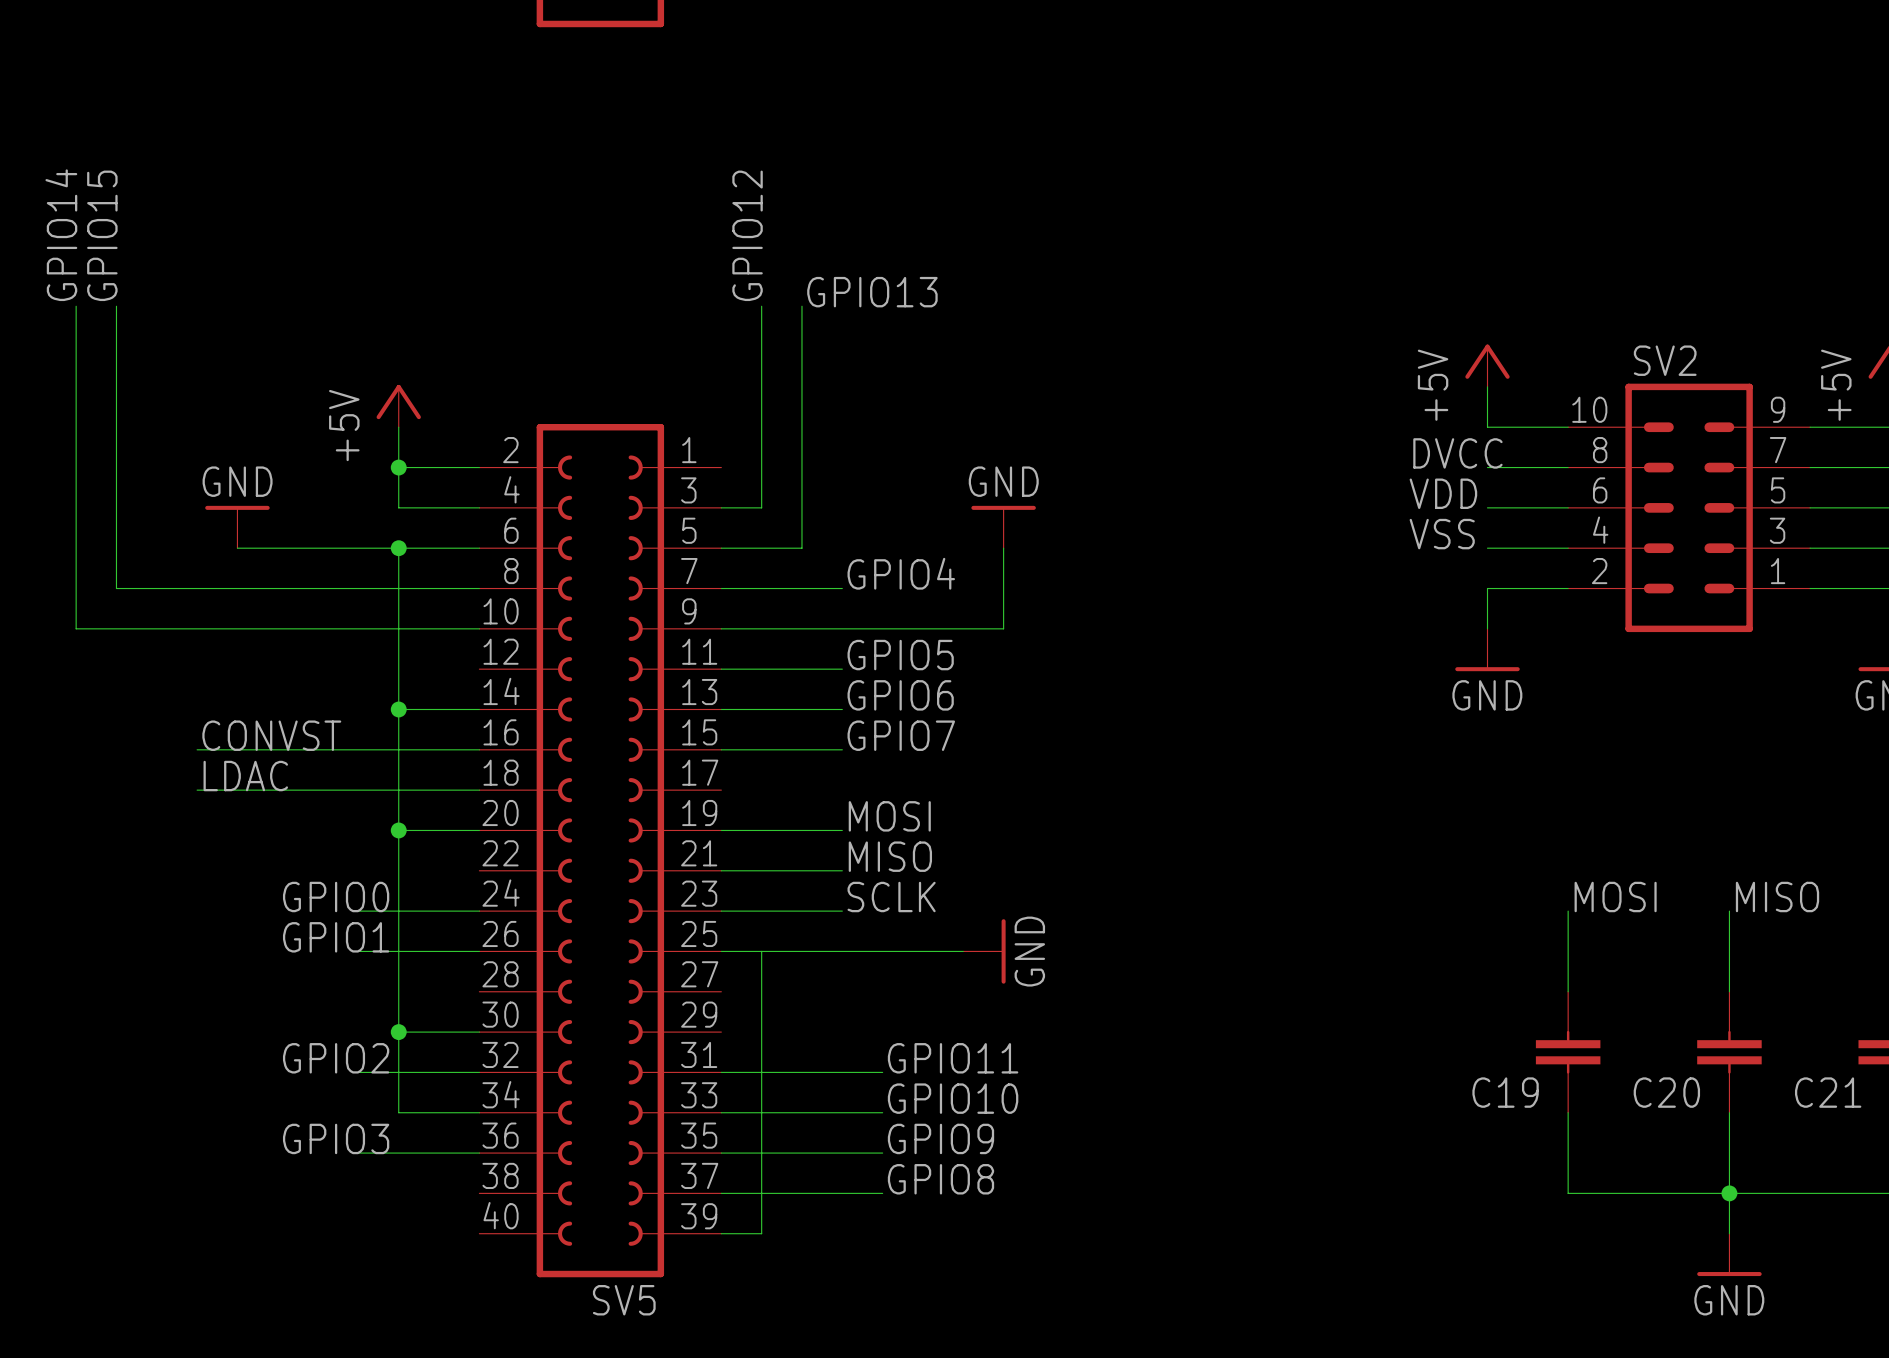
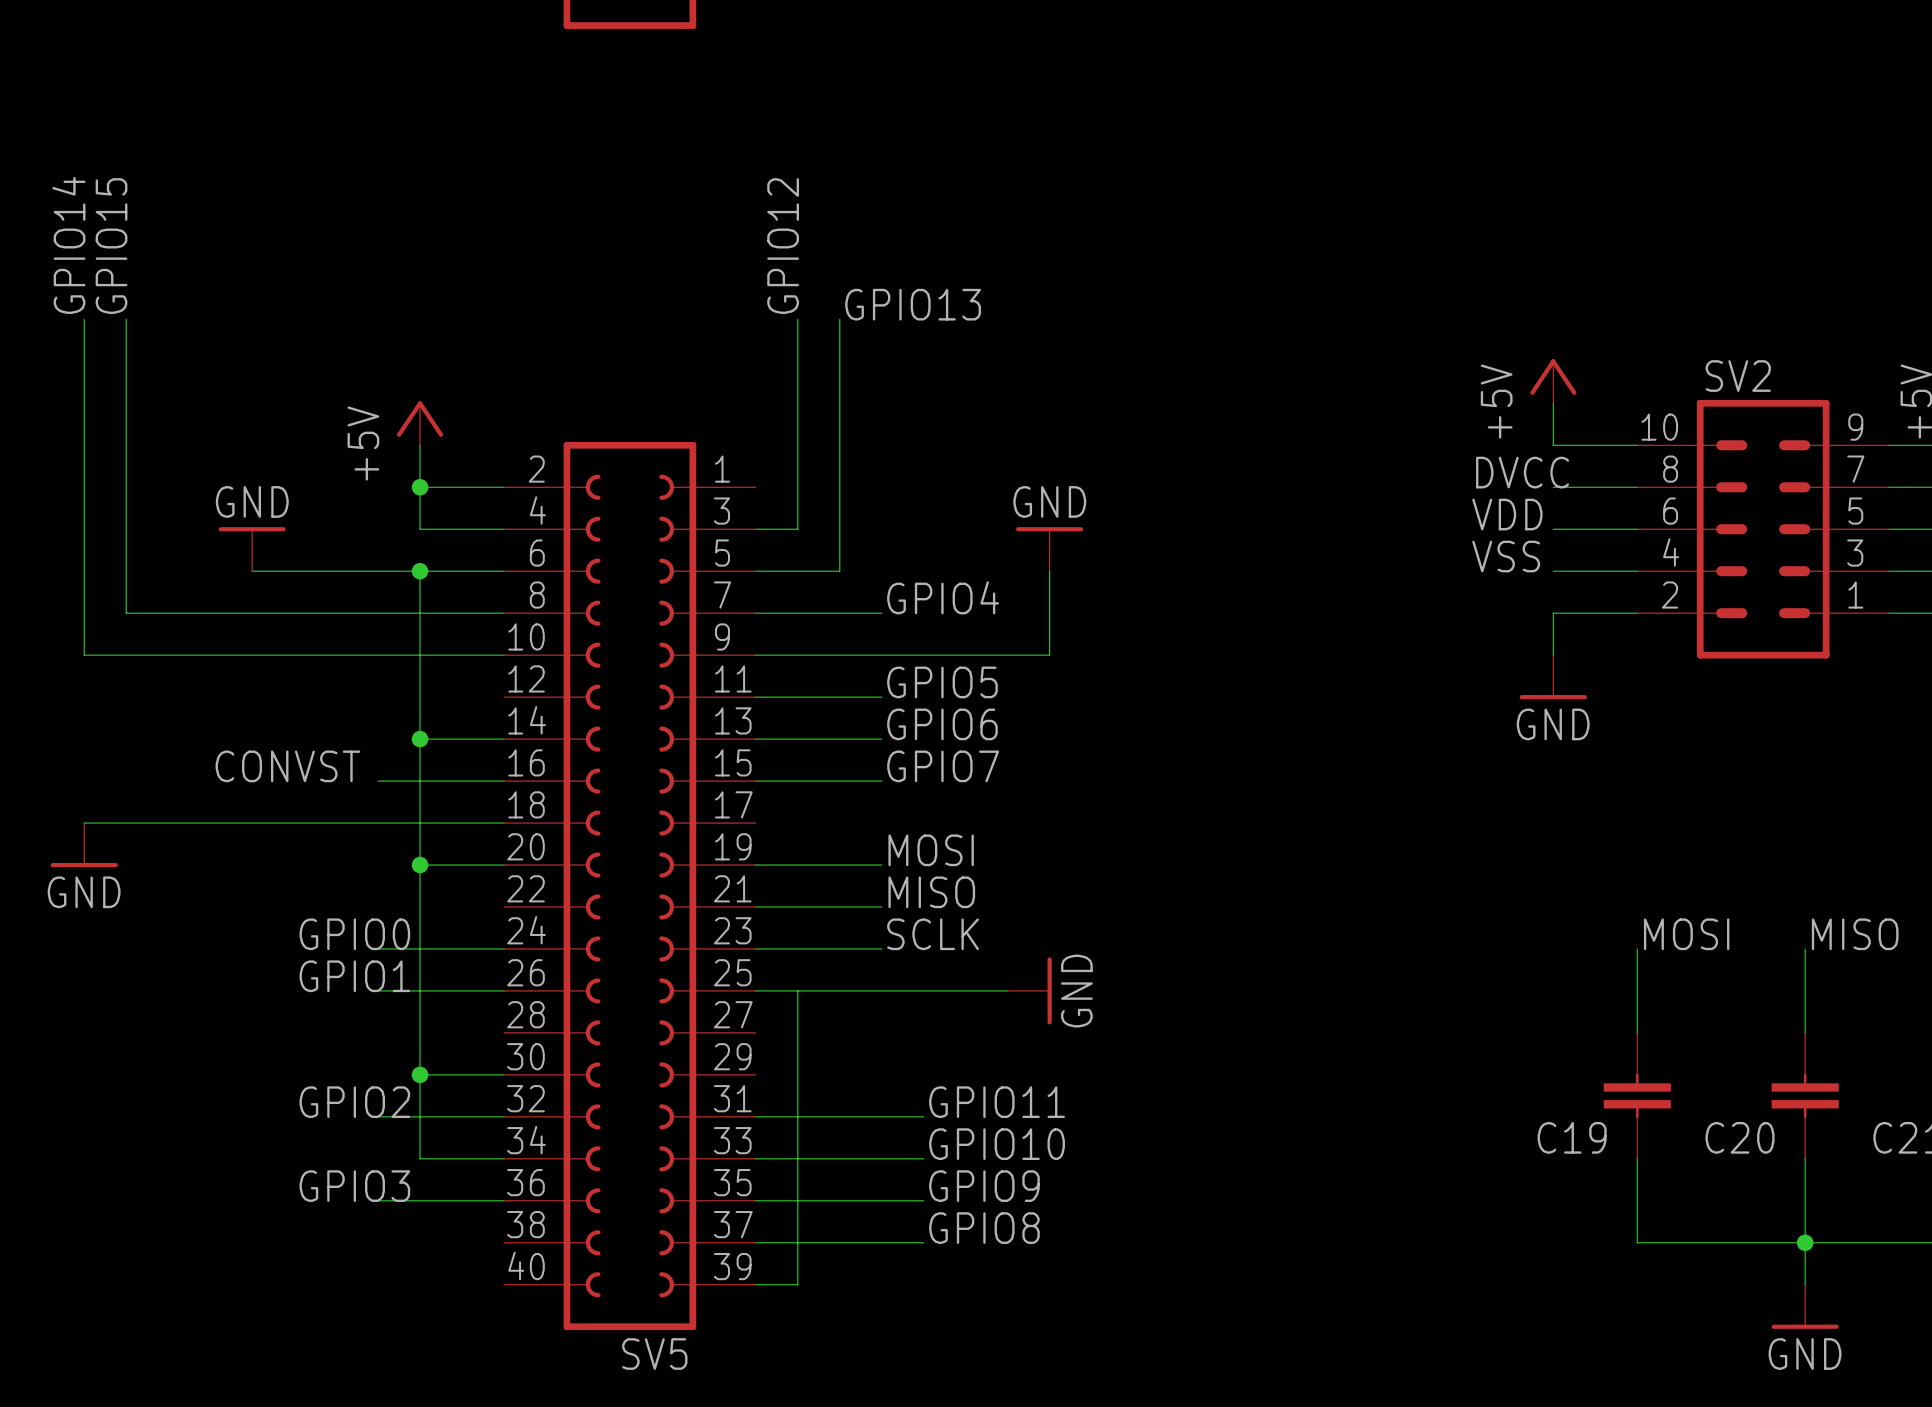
wire: (197, 749) (358, 749) -> none
label: LDAC (245, 776) -> none
wire: none -> (84, 823) (210, 823)
power symbol: none -> GND (84, 845)

